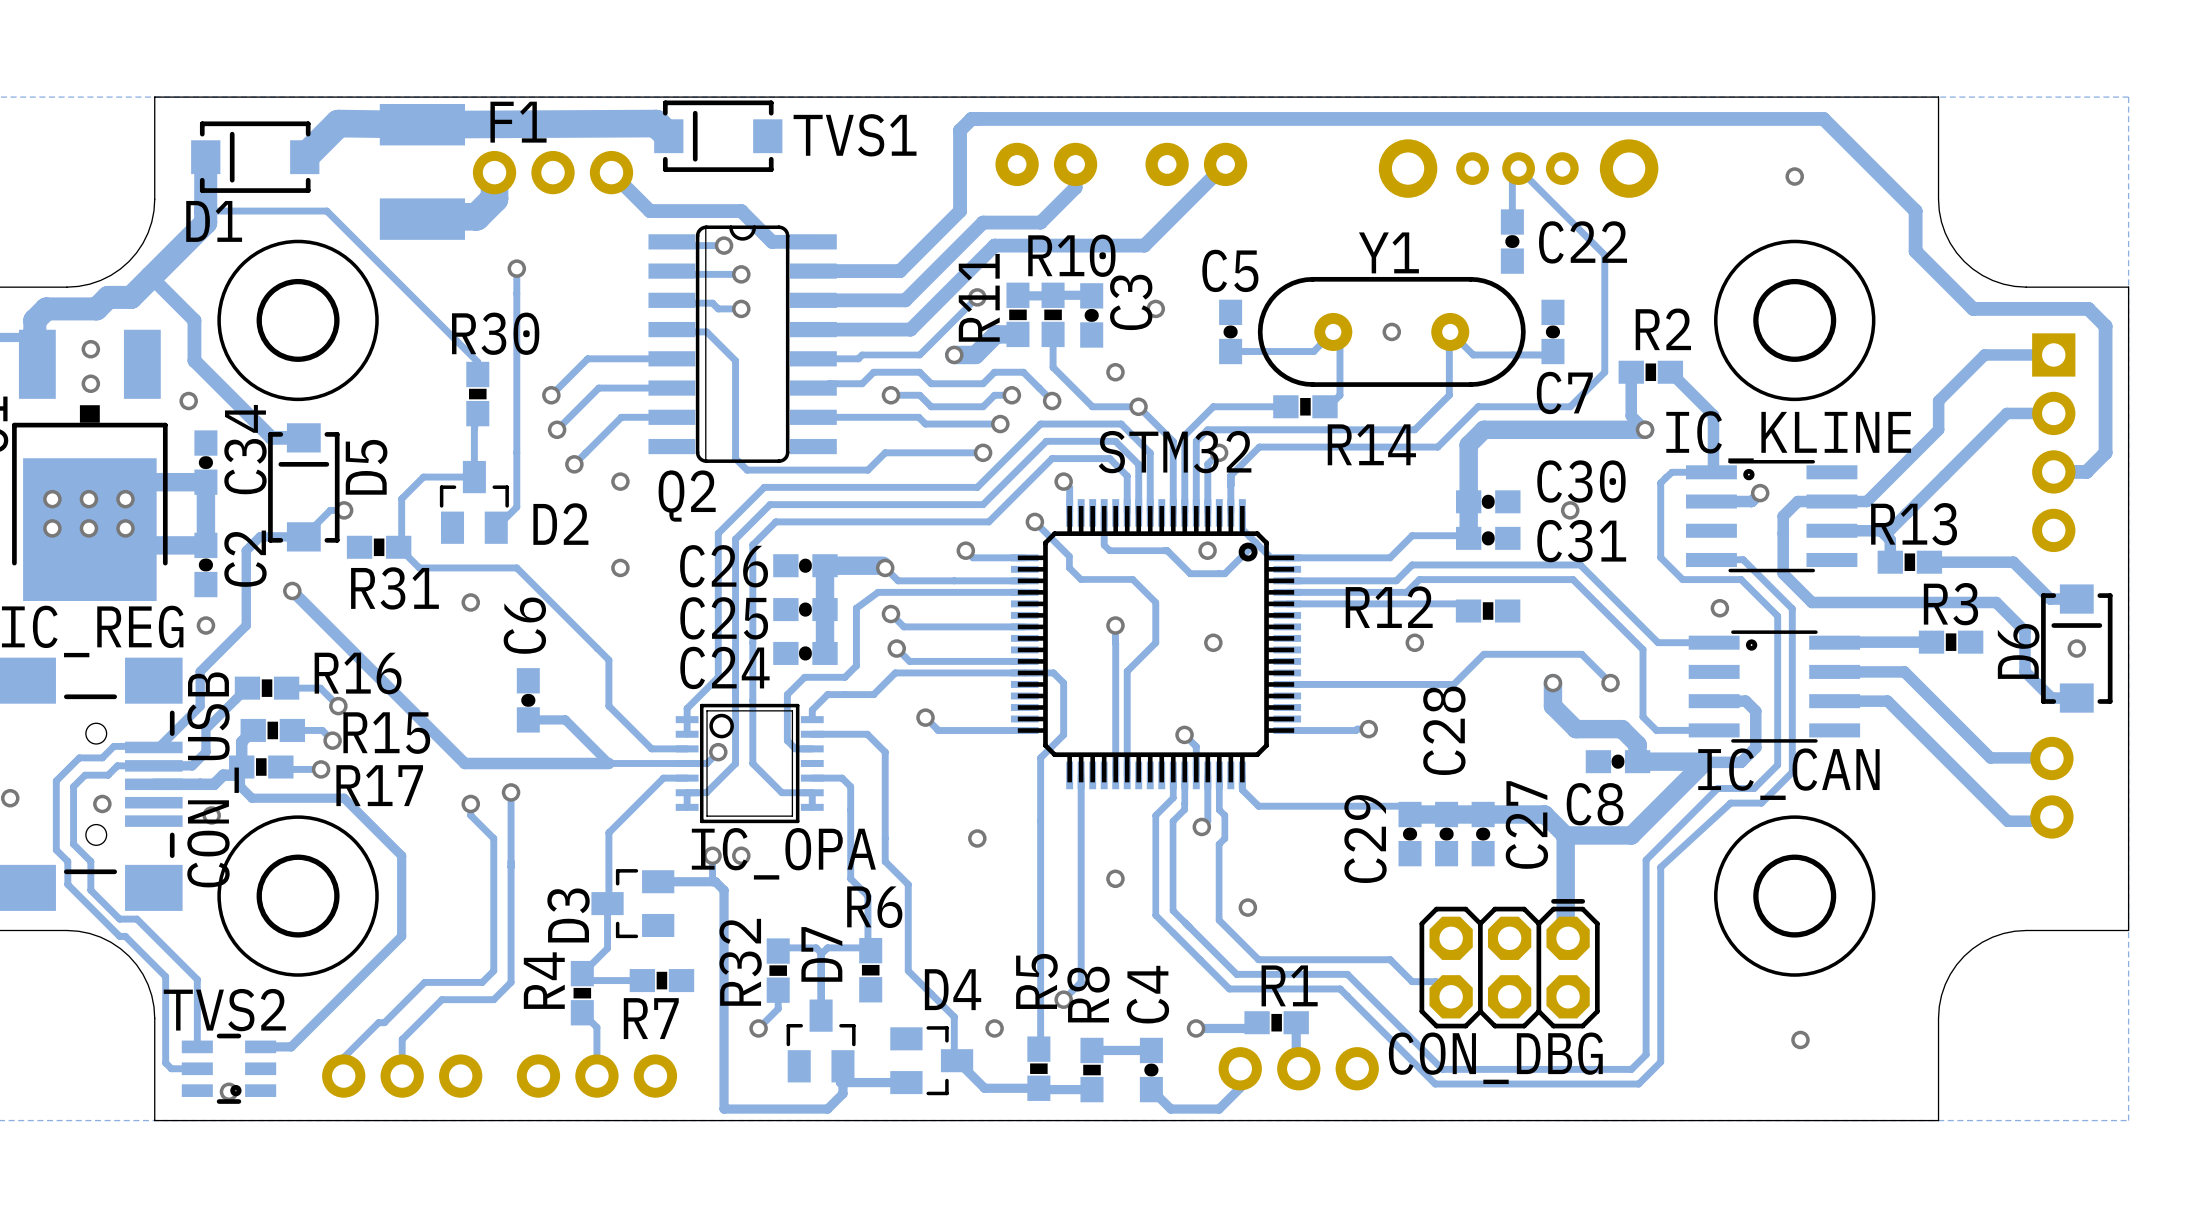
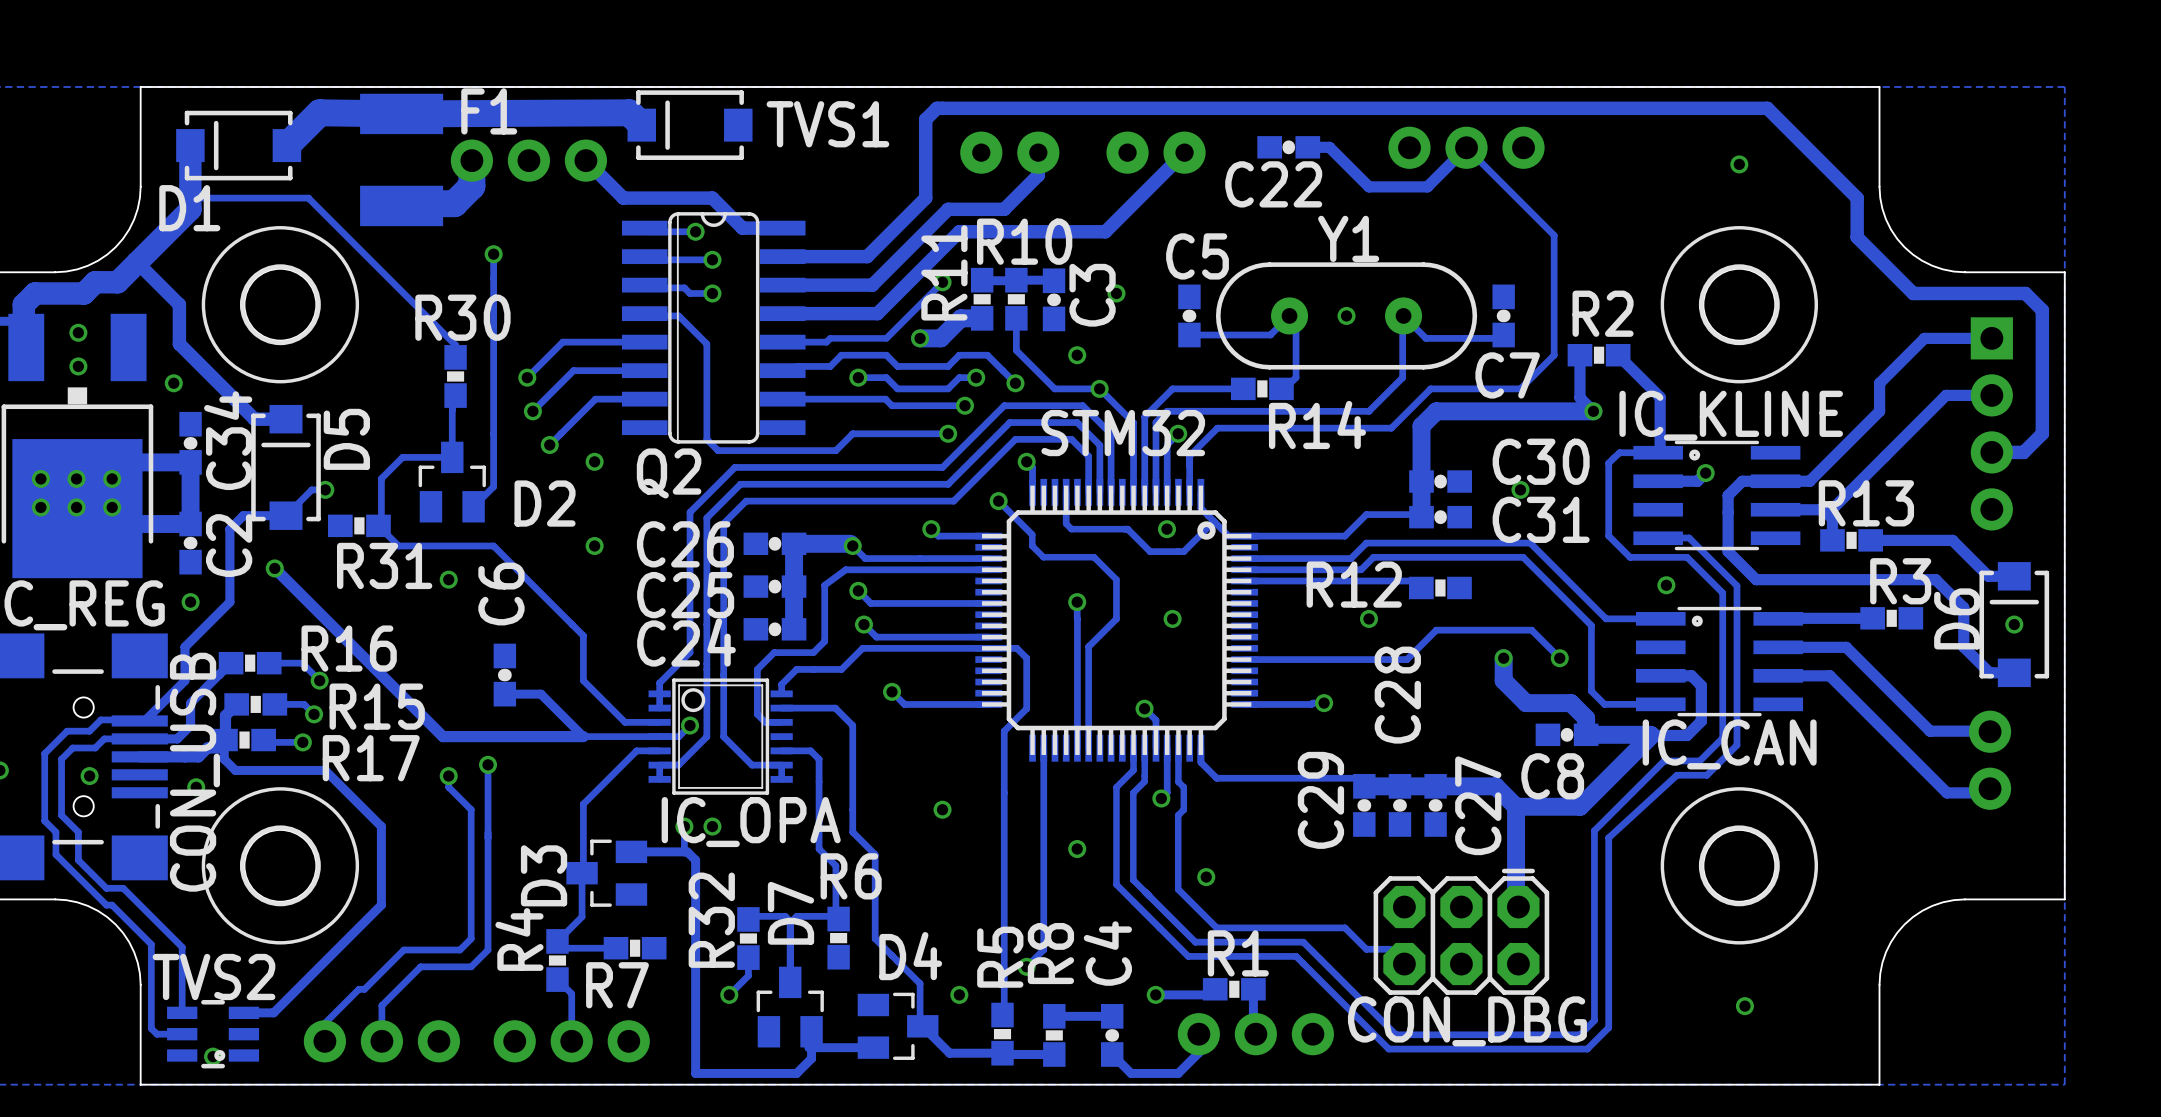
part footprint: [1378, 139, 1659, 198] -> [1388, 126, 1545, 169]
track: none -> (1307, 147) (1329, 147) (1368, 186) (1427, 186) (1466, 147)
track: (1512, 221) (1512, 169) (1518, 168) (1604, 255) -> (1466, 147) (1554, 235) (1554, 241)
C22 rotation: 0° (1512, 241) -> 90° clockwise (1288, 147)
C22 position: (1512, 241) -> (1288, 147)
C22 name position: C22 (1583, 242) -> C22 (1273, 184)

